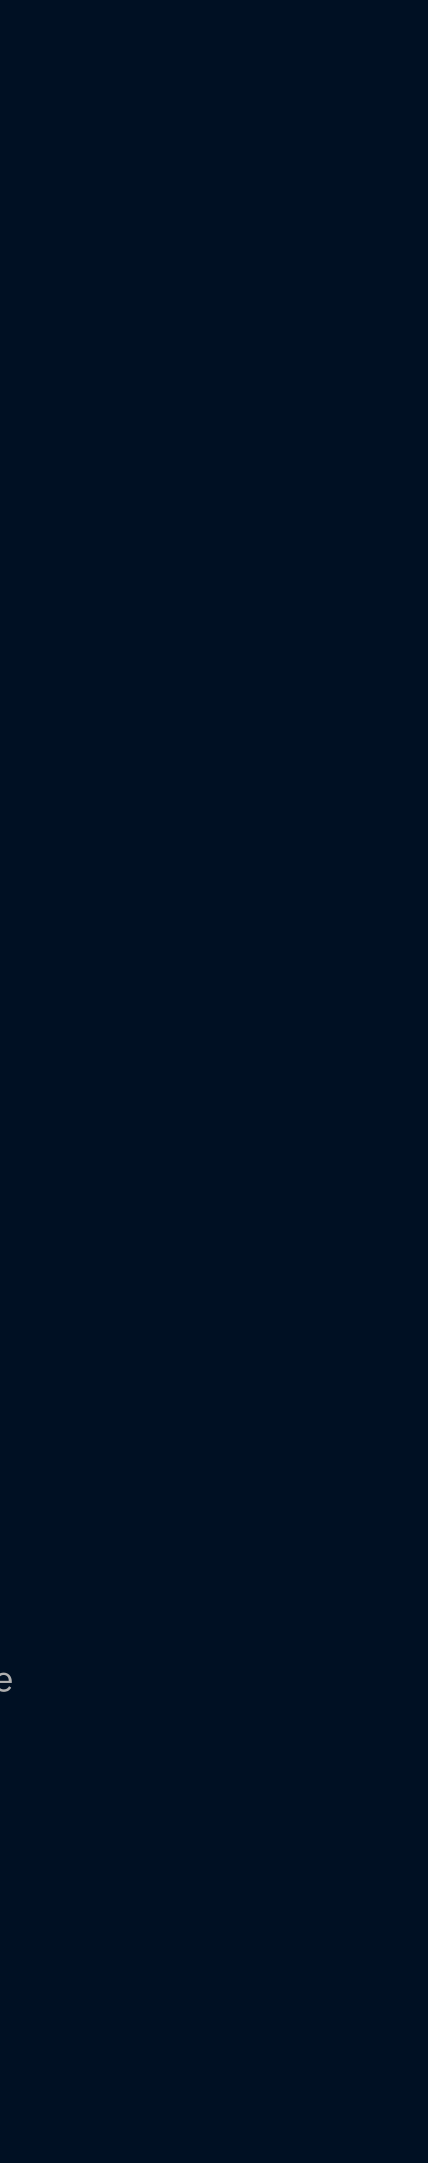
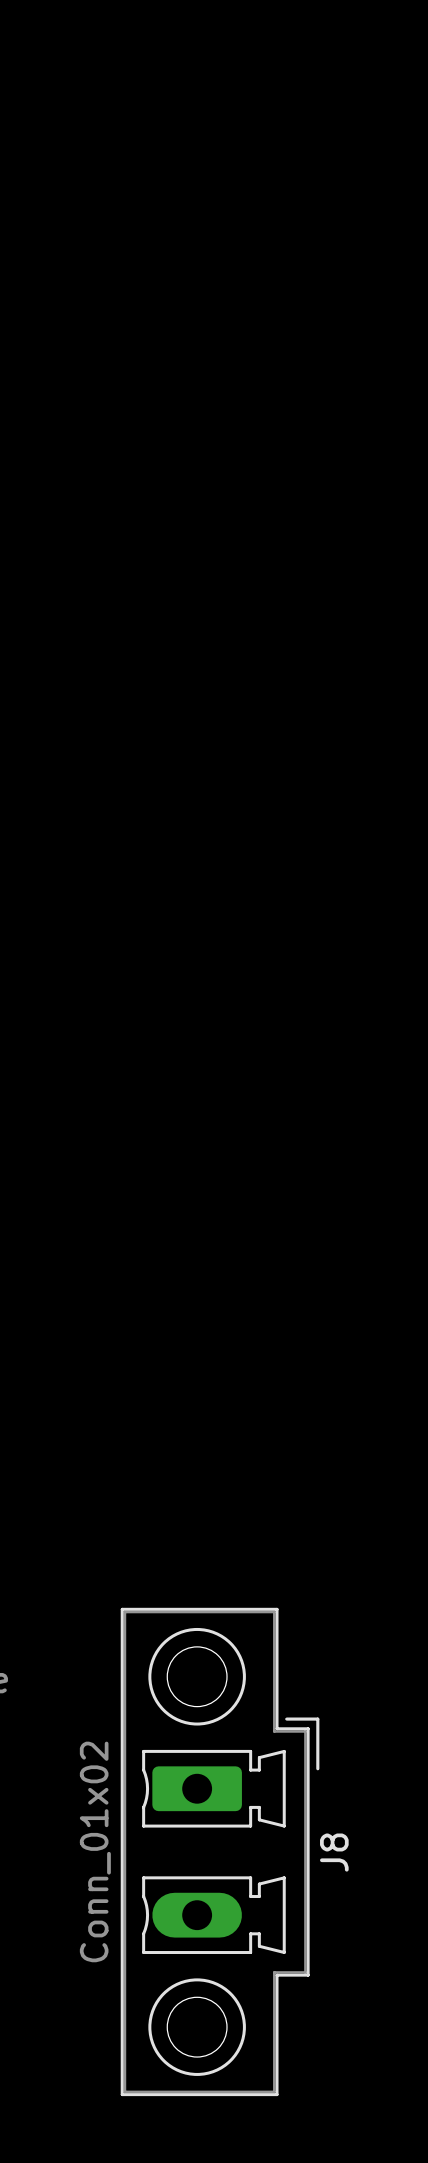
J8: none -> Conn_01x02 (220, 1851)

